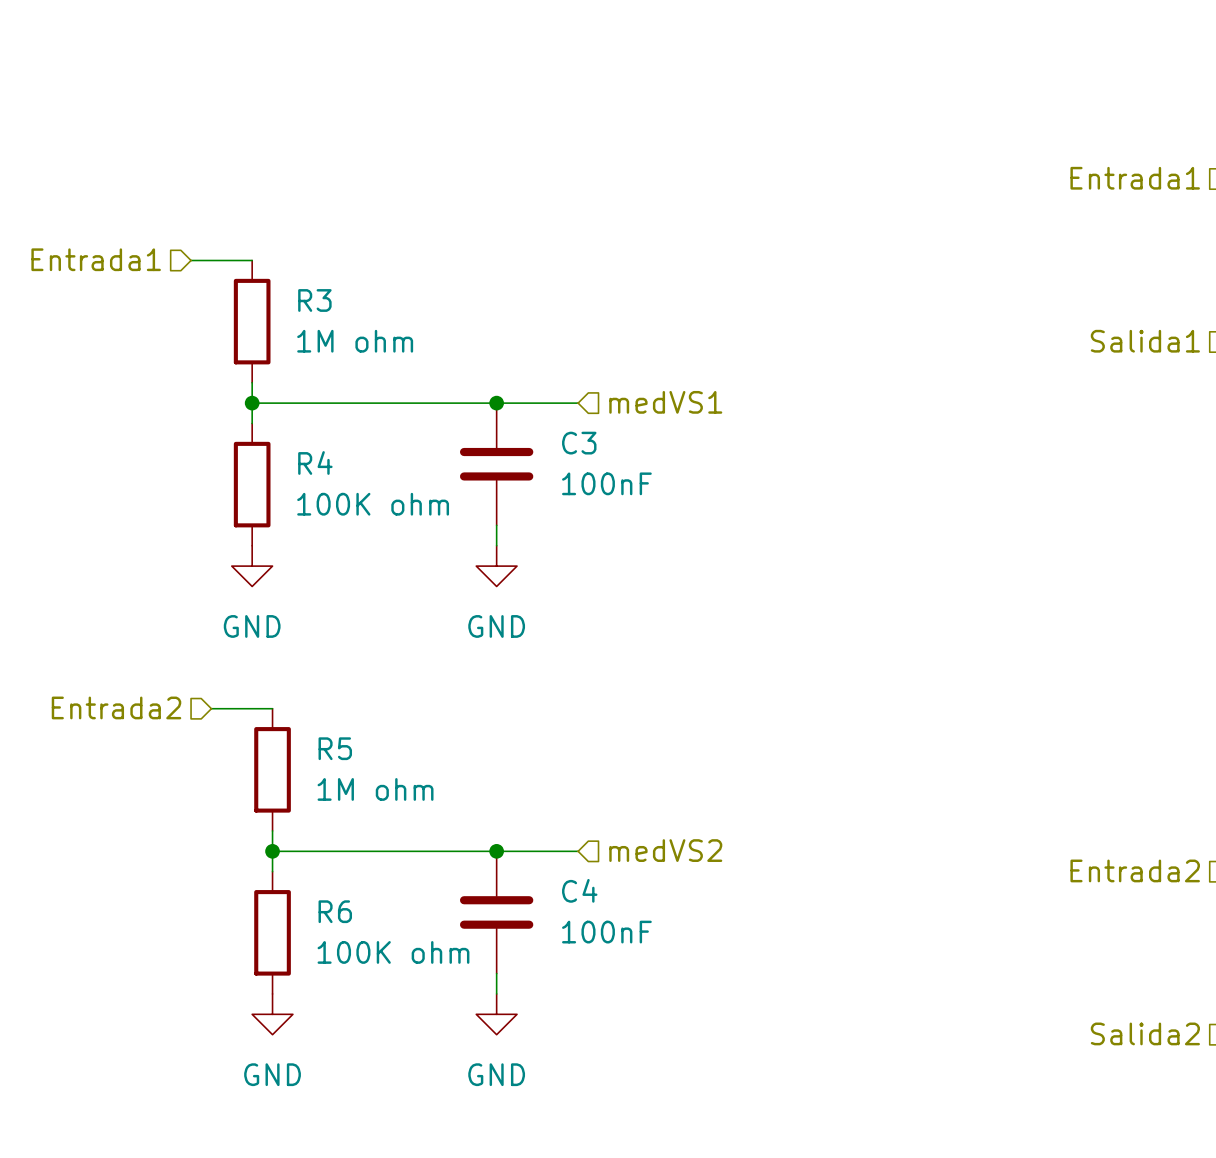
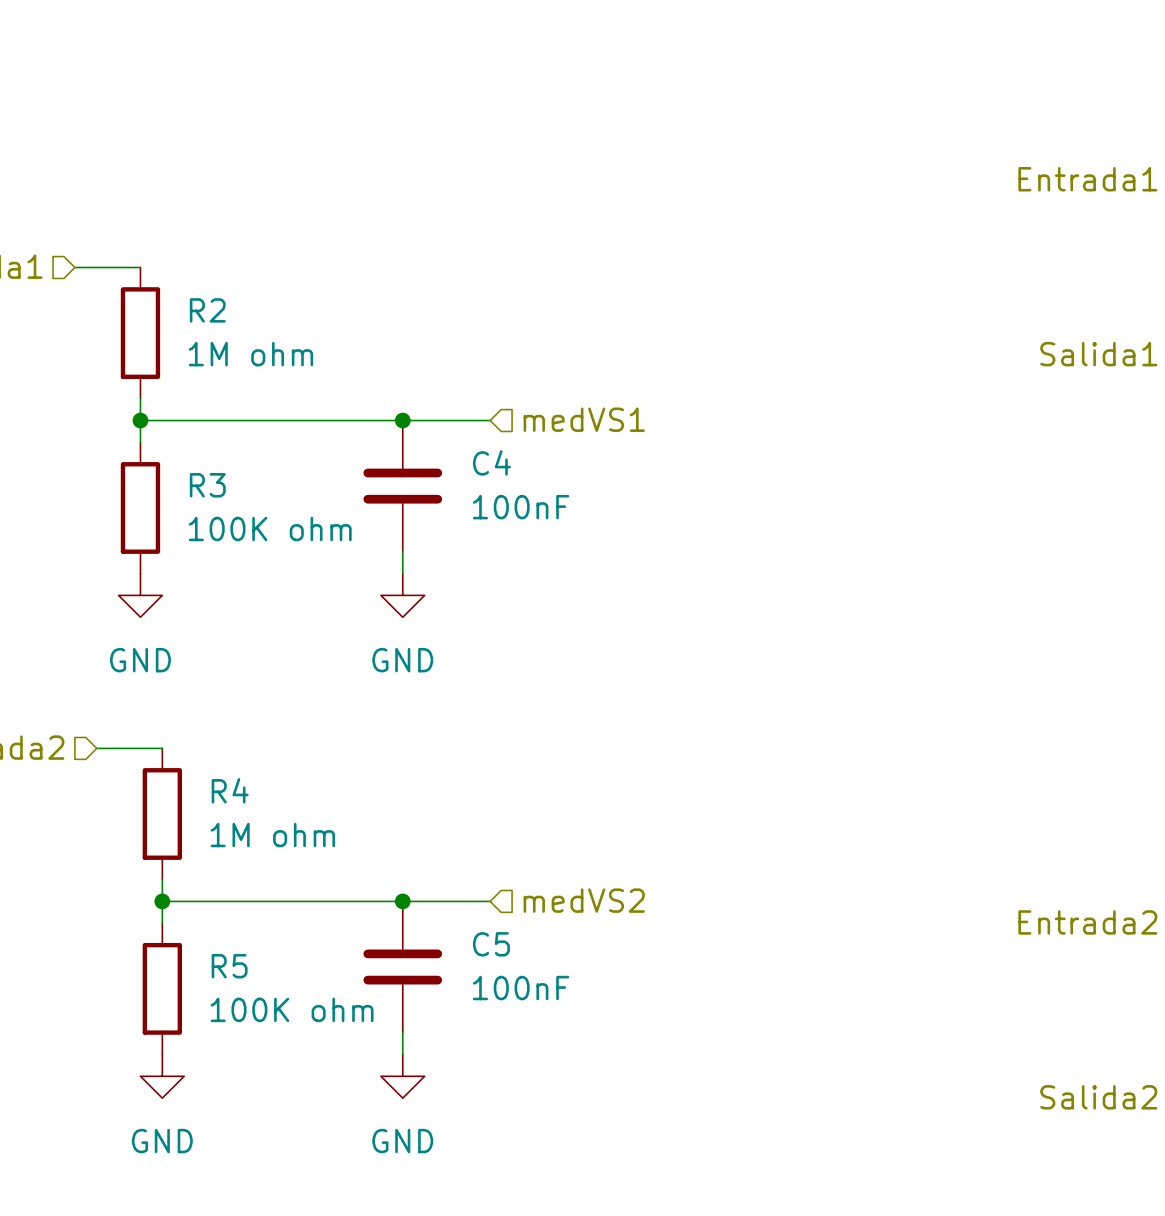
R3 name: R3 (314, 300) -> R2 (207, 310)
C3 name: C3 (579, 443) -> C4 (491, 462)
R4 name: R4 (315, 462) -> R3 (207, 485)
R5 name: R5 (335, 748) -> R4 (230, 790)
C4 name: C4 (579, 890) -> C5 (491, 944)
R6 name: R6 (335, 911) -> R5 (229, 966)

